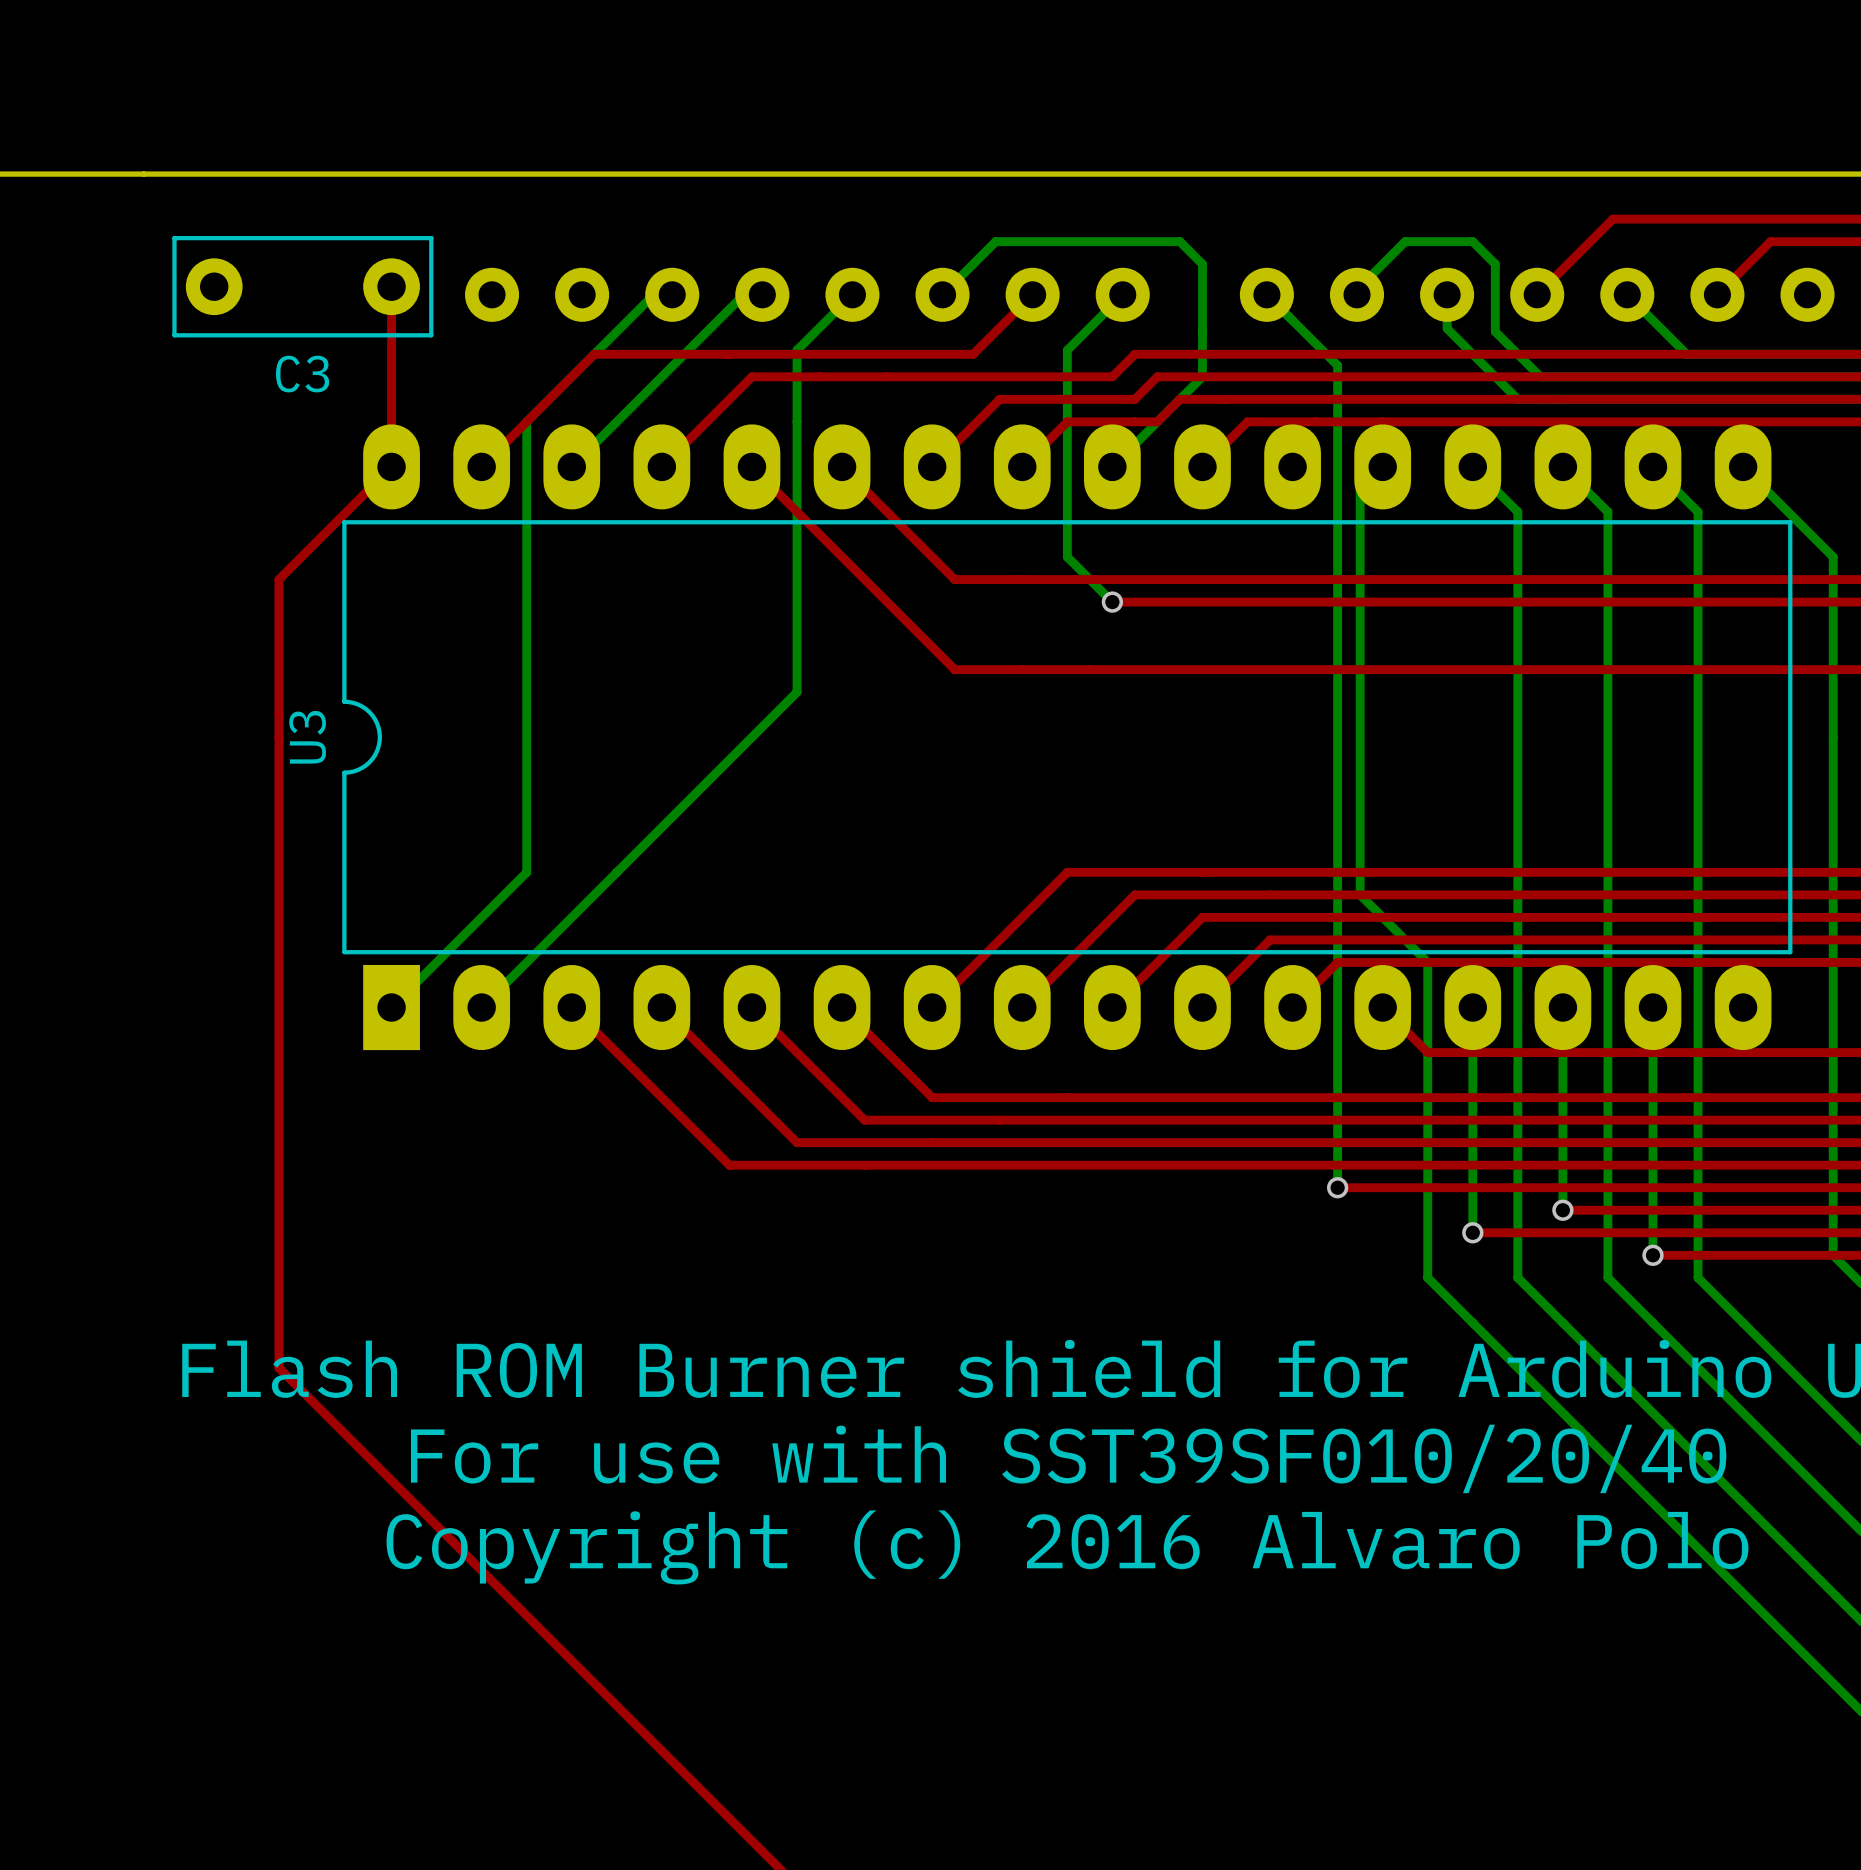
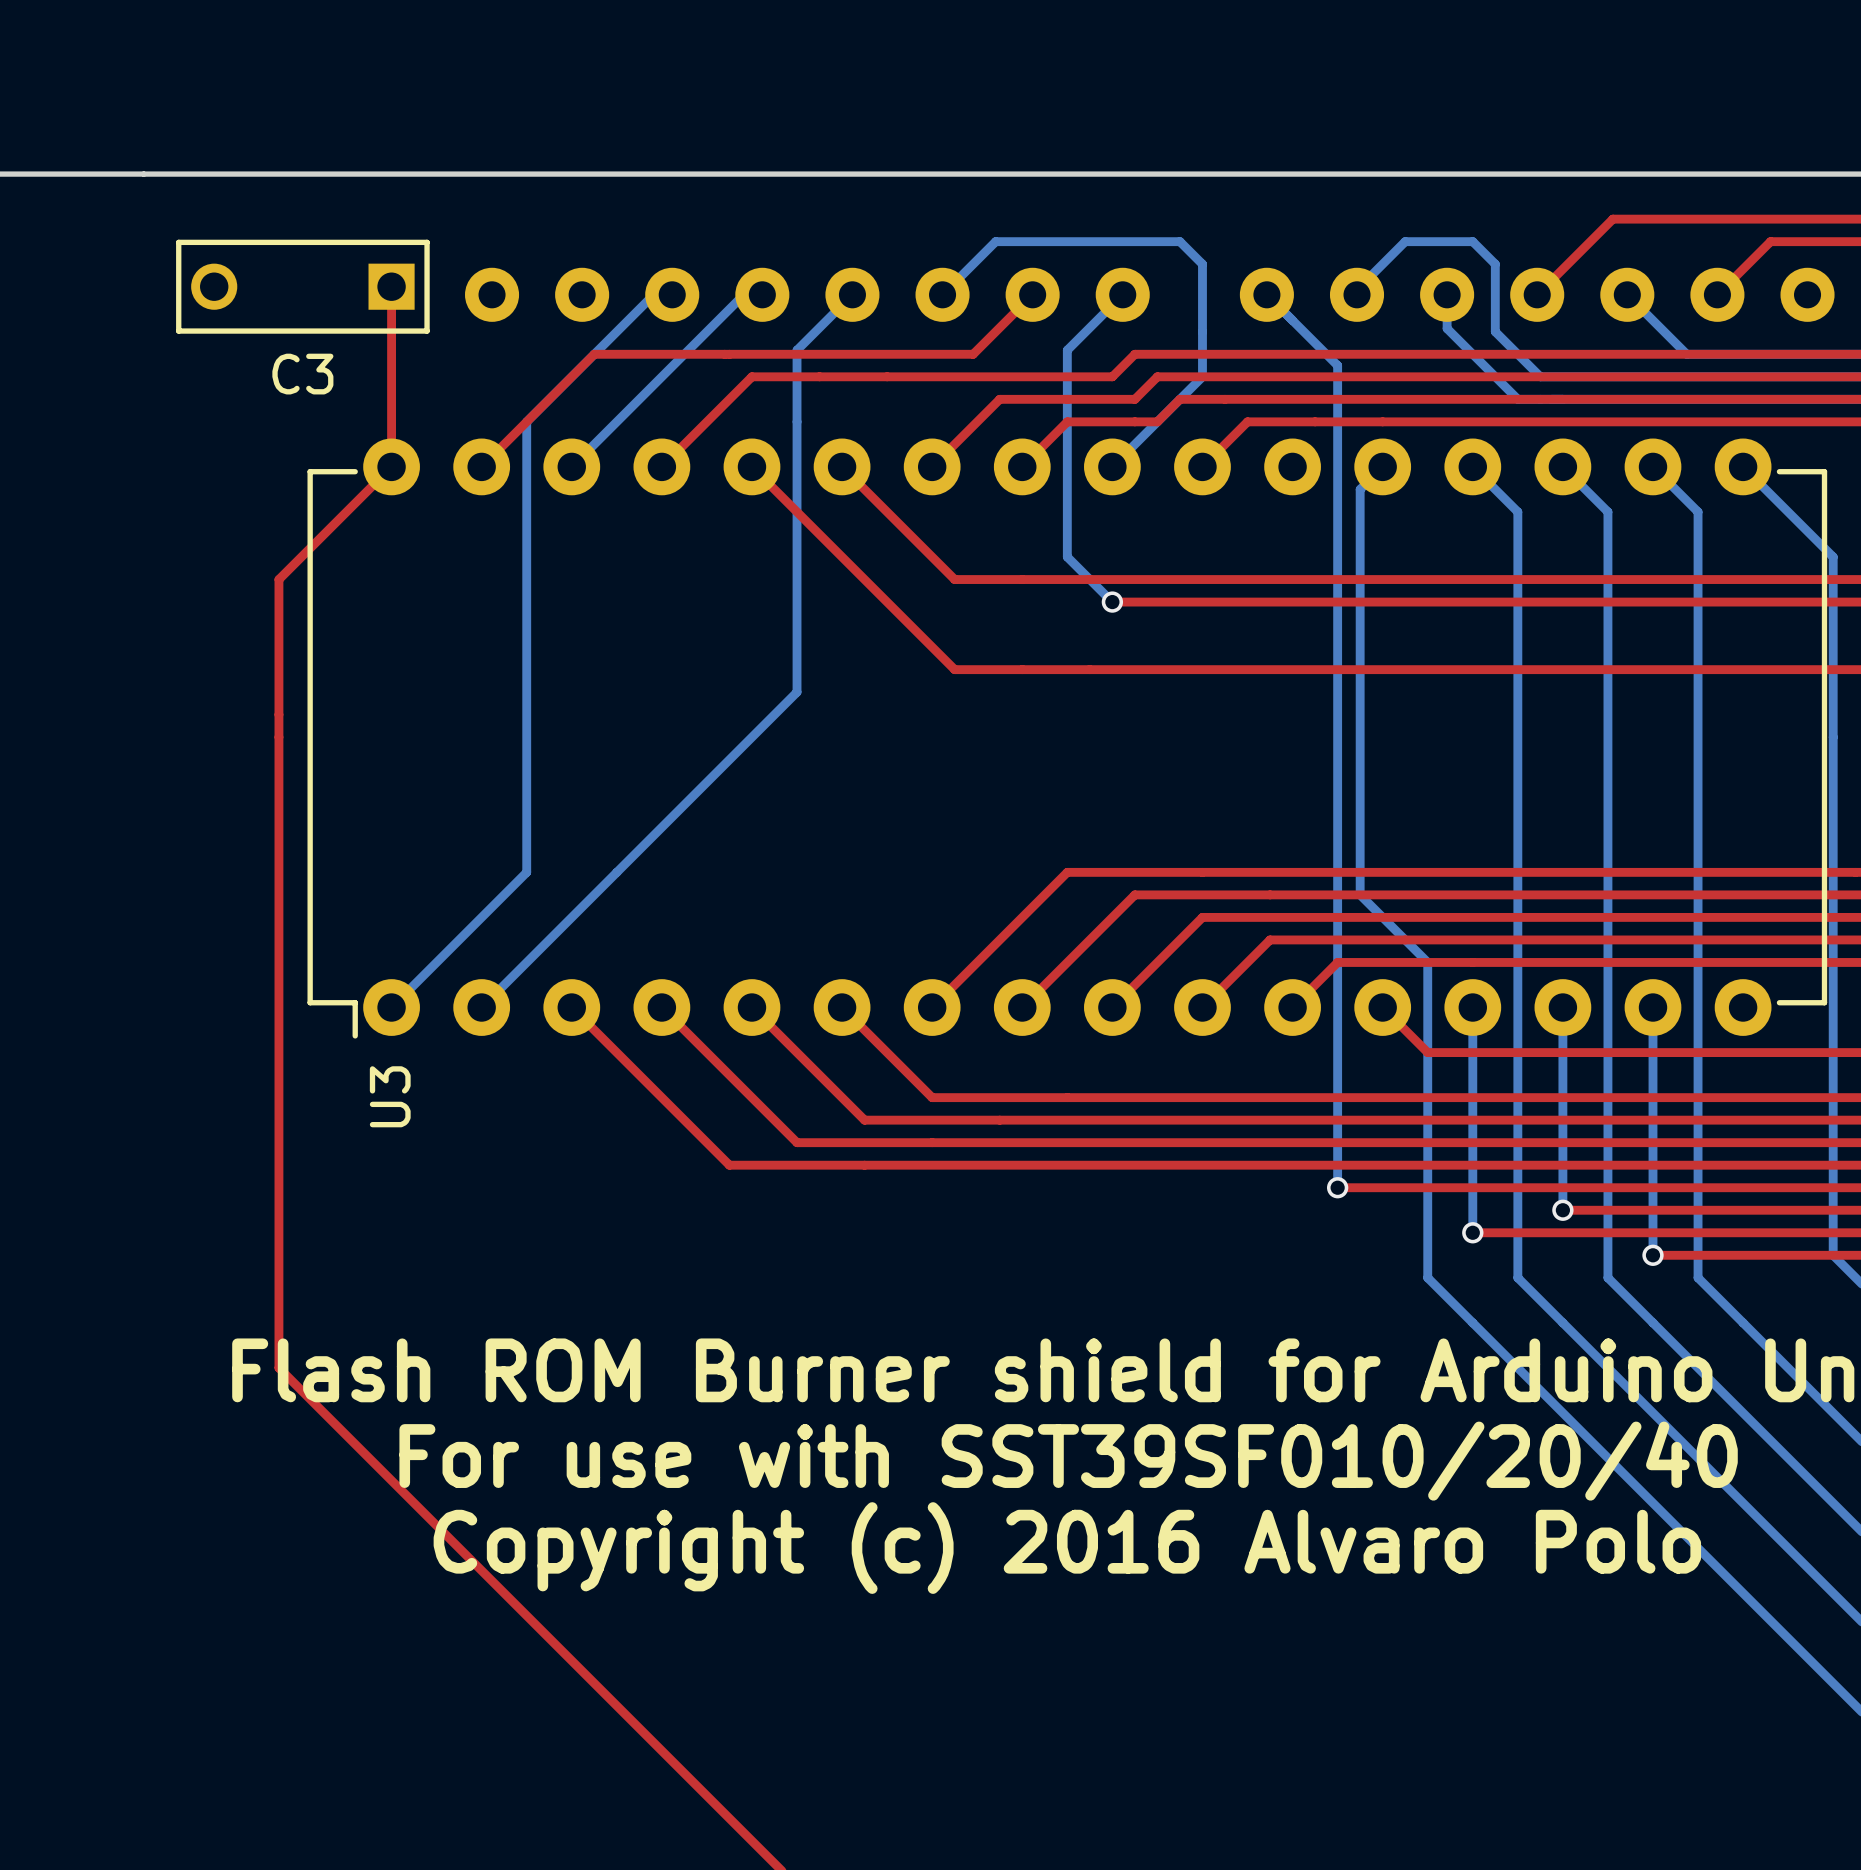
C3 footprint: [172, 235, 434, 338] -> [176, 239, 430, 334]
U3 footprint: [342, 424, 1793, 1051] -> [307, 438, 1828, 1039]
U3 name position: U3 (307, 737) -> U3 (390, 1096)

